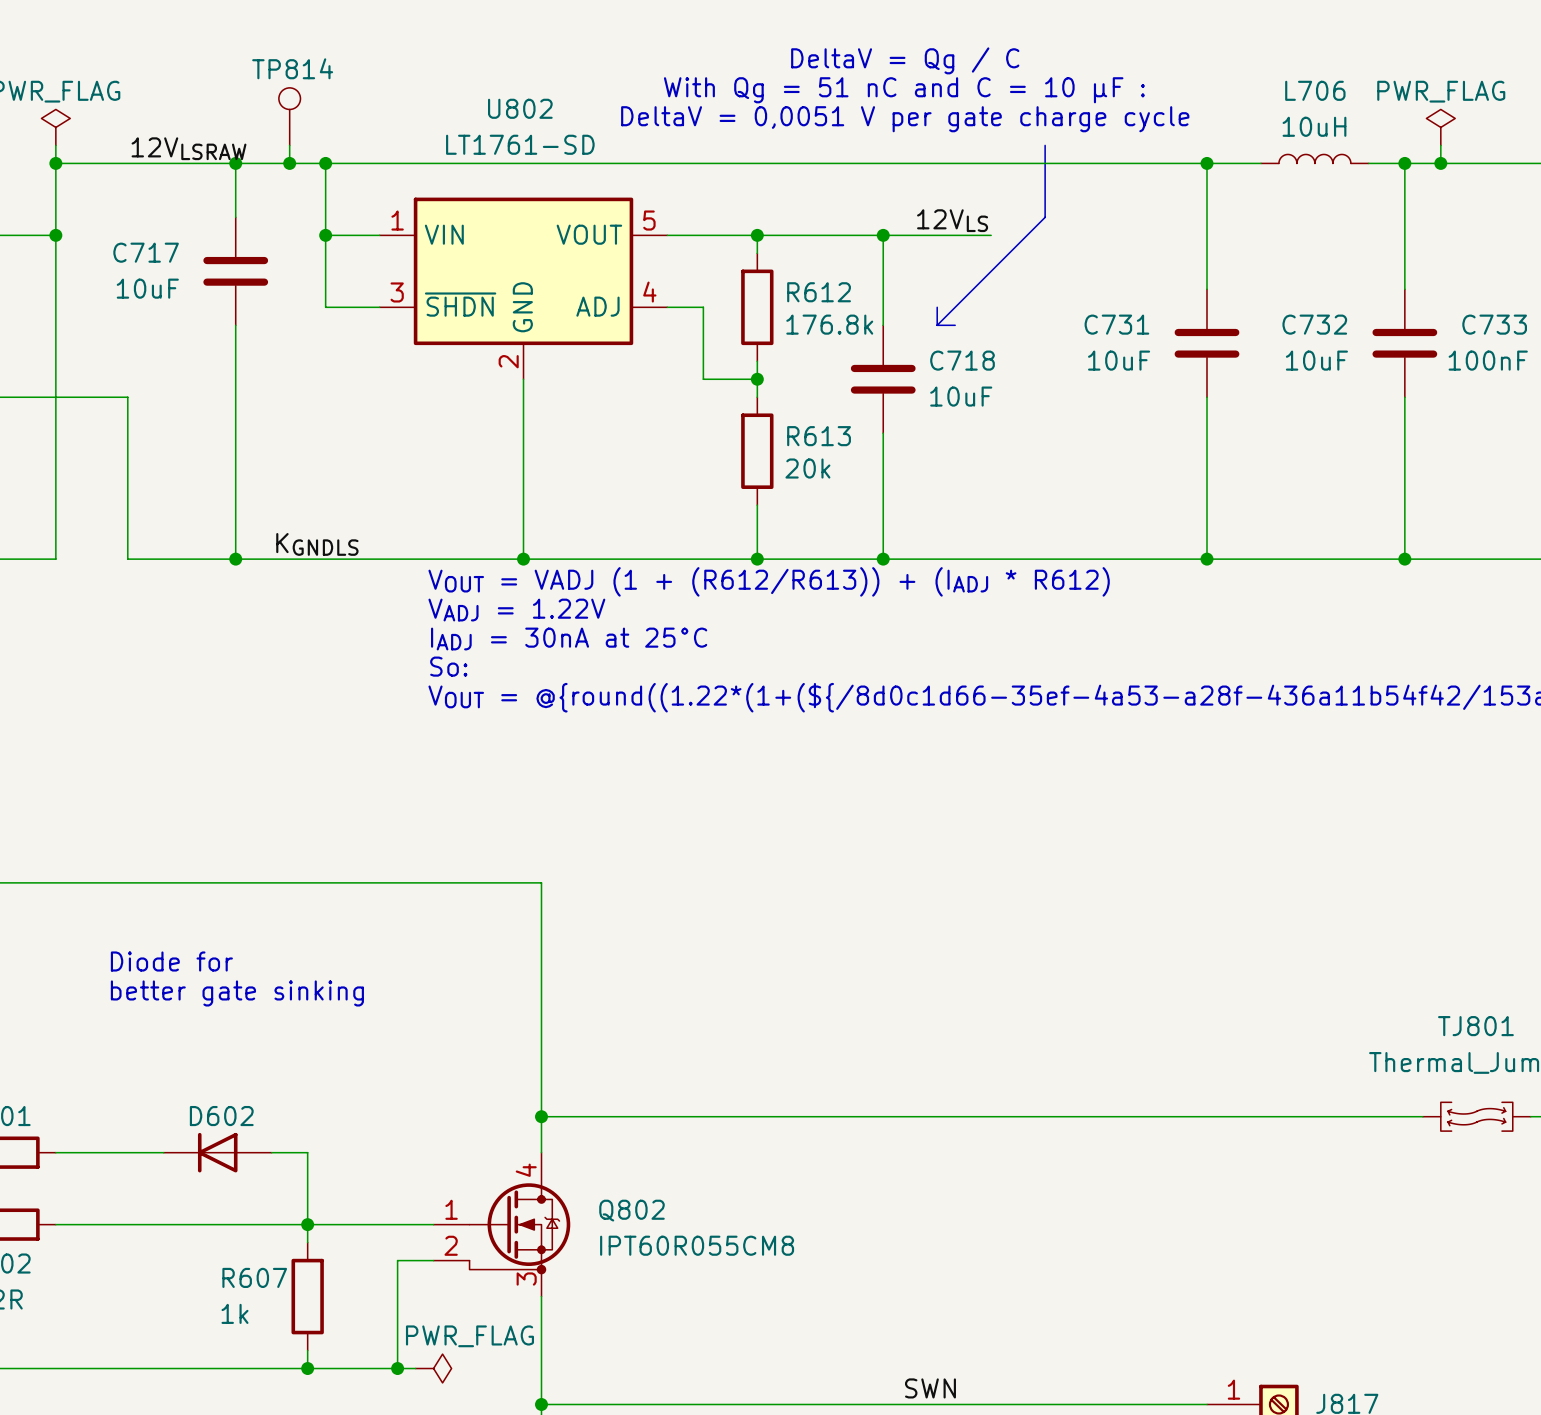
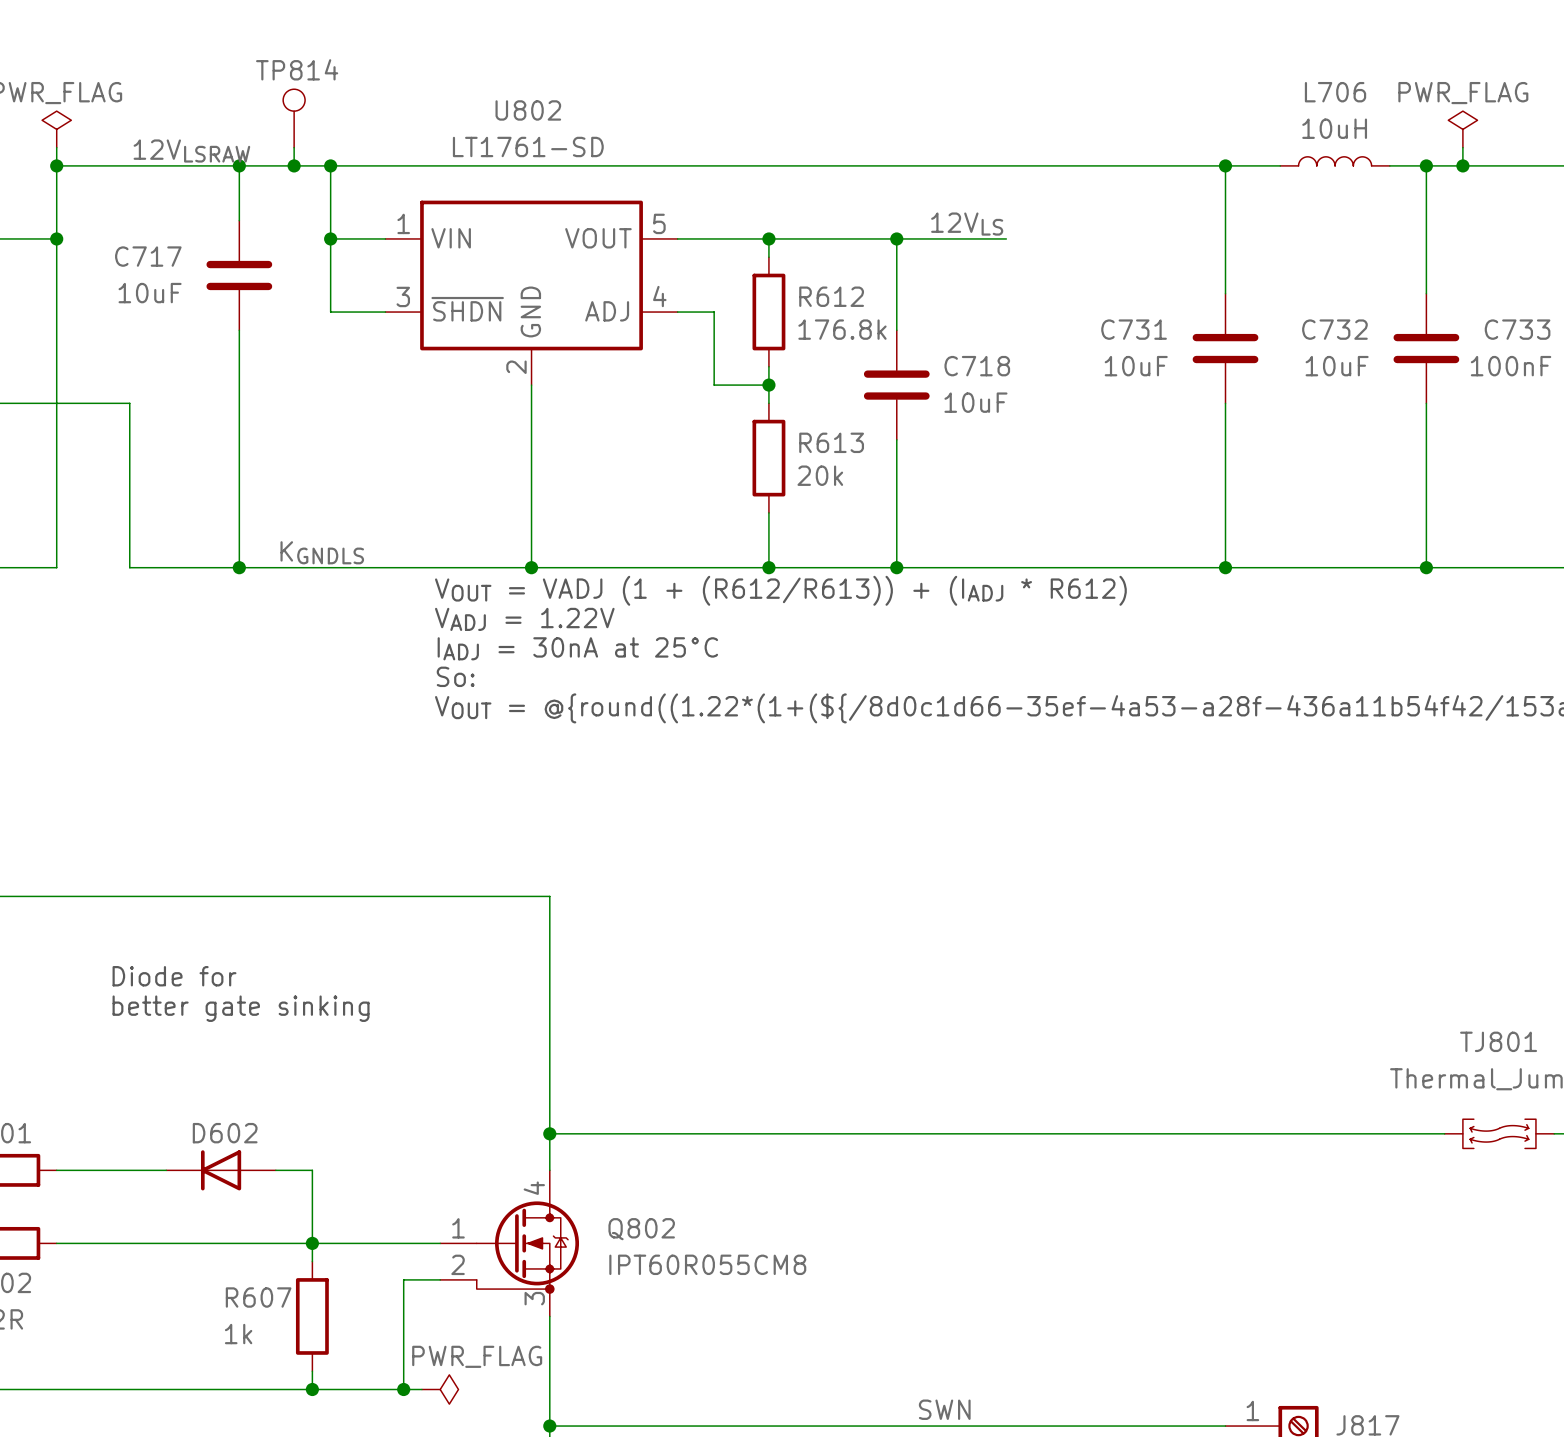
text: DeltaV = Qg / C (905, 60) -> none
text: With Qg = 51 nC and C = 10 µF : (904, 90) -> none
text: DeltaV = 0,0051 V per gate charge cycle (905, 119) -> none
line: (1045, 145) (1045, 217) (937, 325) -> none
line: (937, 307) (937, 325) -> none
line: (937, 325) (955, 325) -> none

